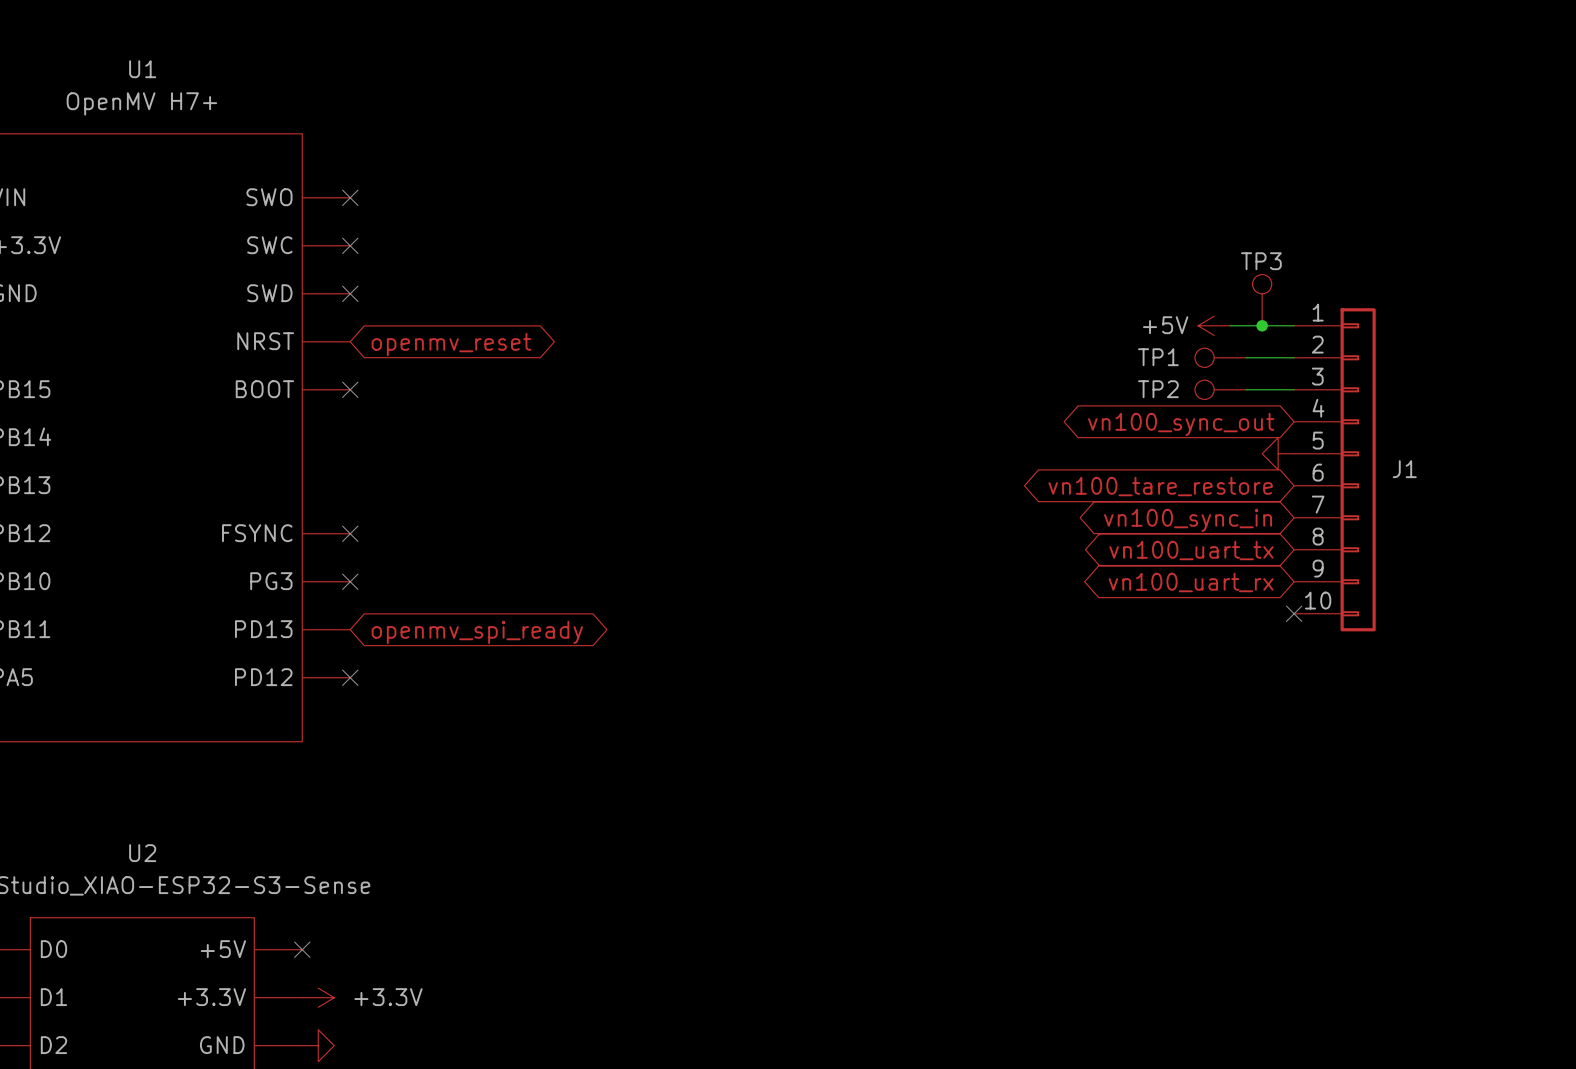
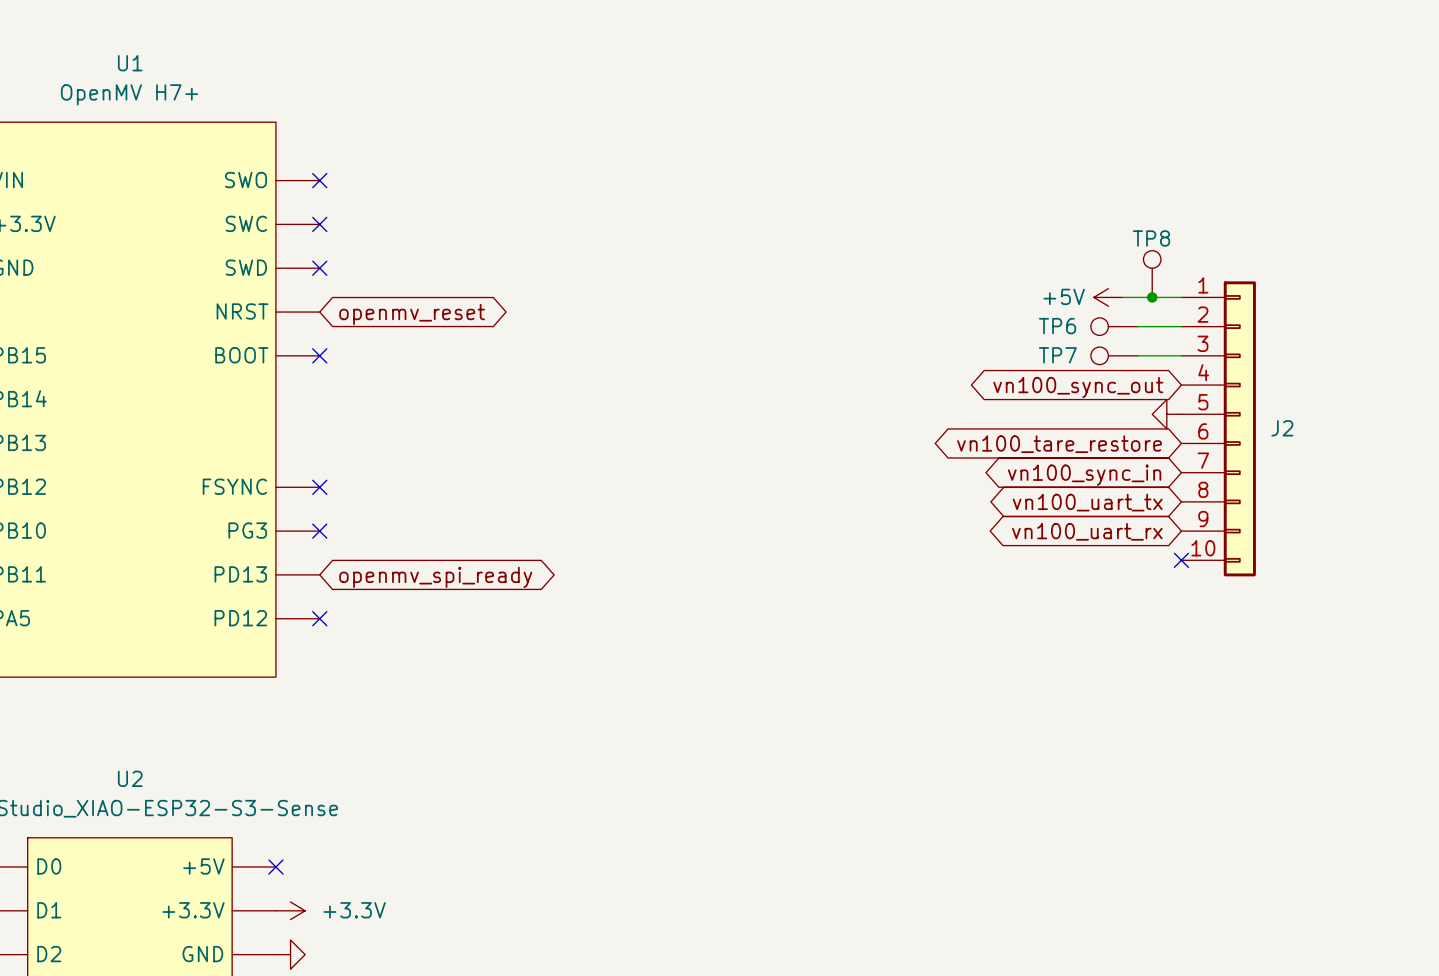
TP3 name: TP3 (1261, 261) -> TP8 (1151, 238)
TP1 name: TP1 (1158, 357) -> TP6 (1057, 326)
TP2 name: TP2 (1158, 389) -> TP7 (1057, 355)
J1 name: J1 (1404, 469) -> J2 (1282, 428)

